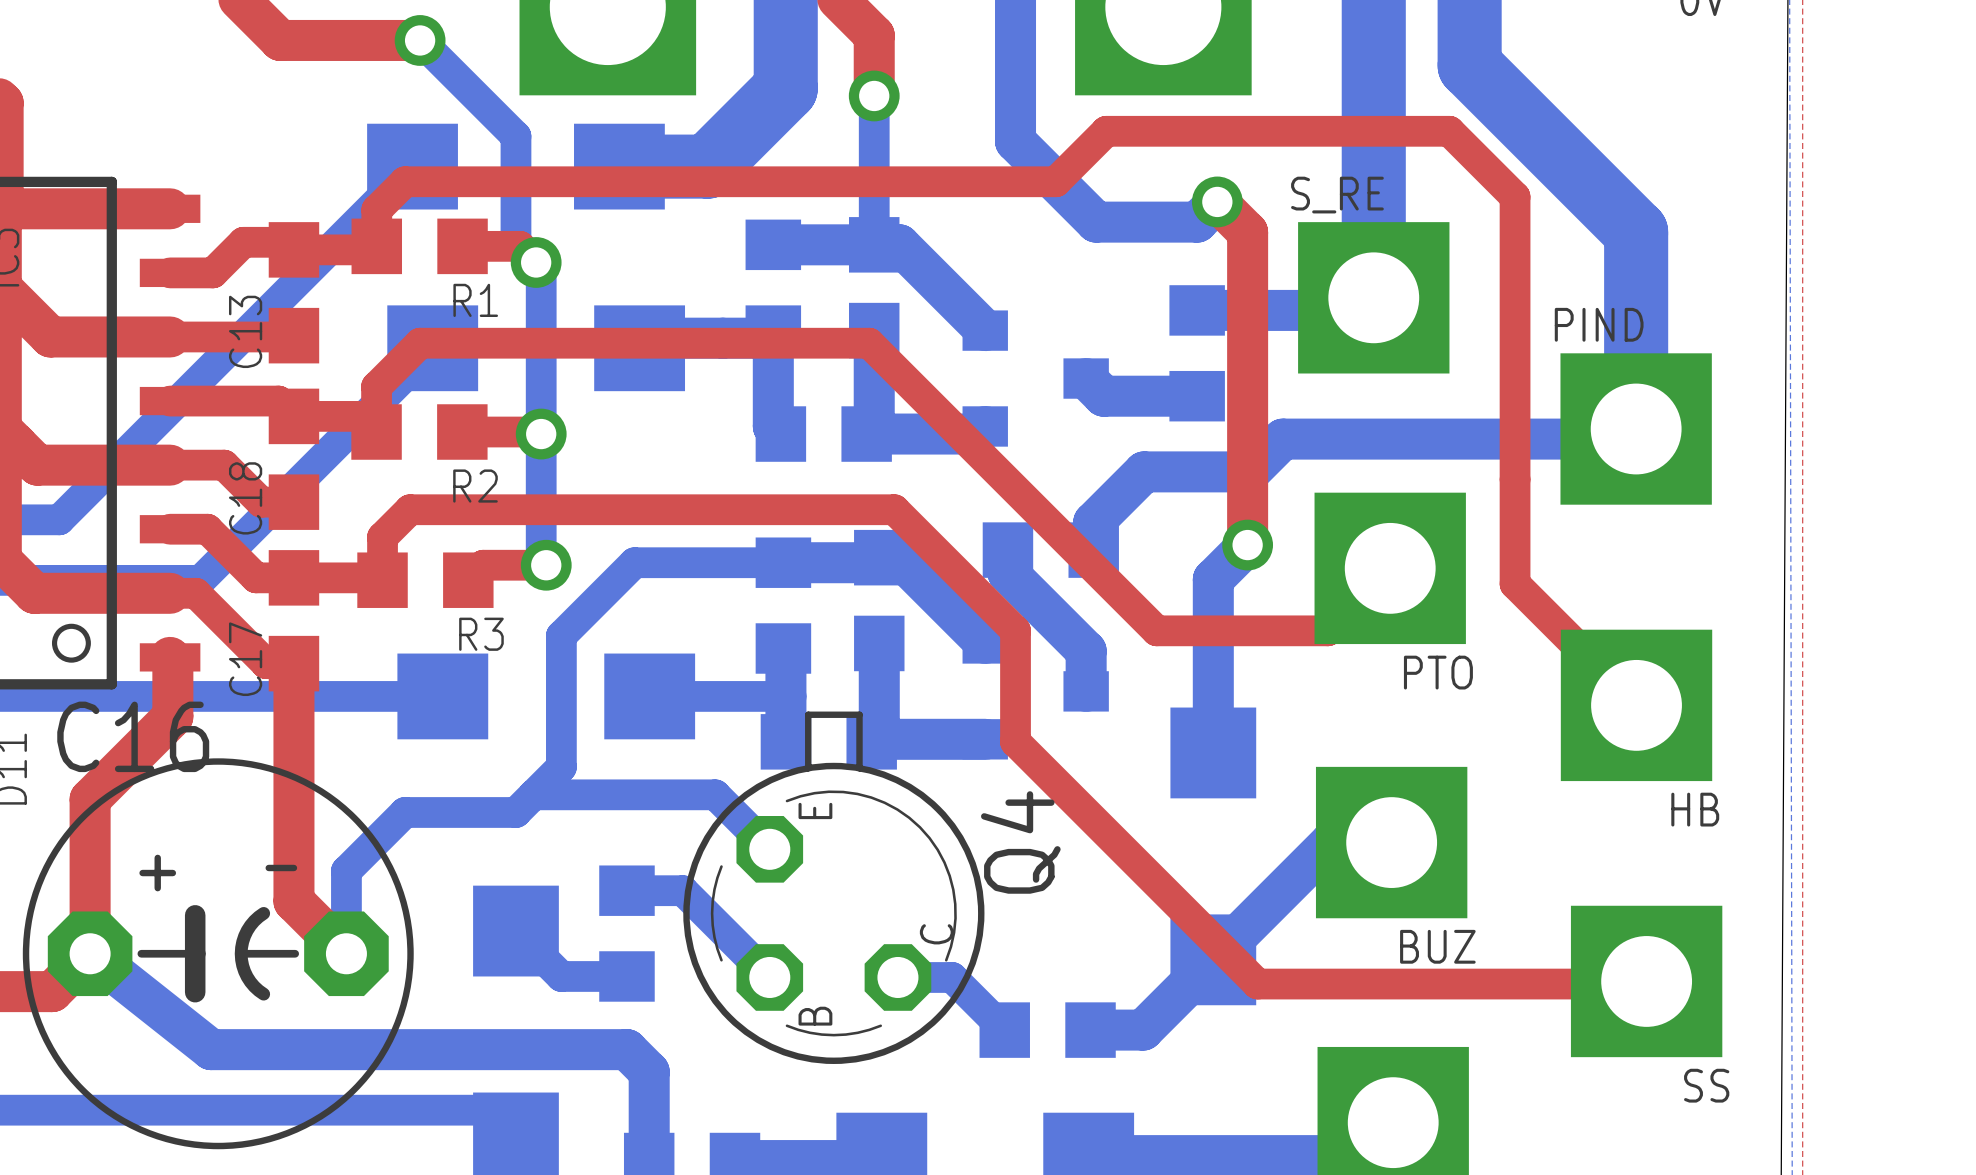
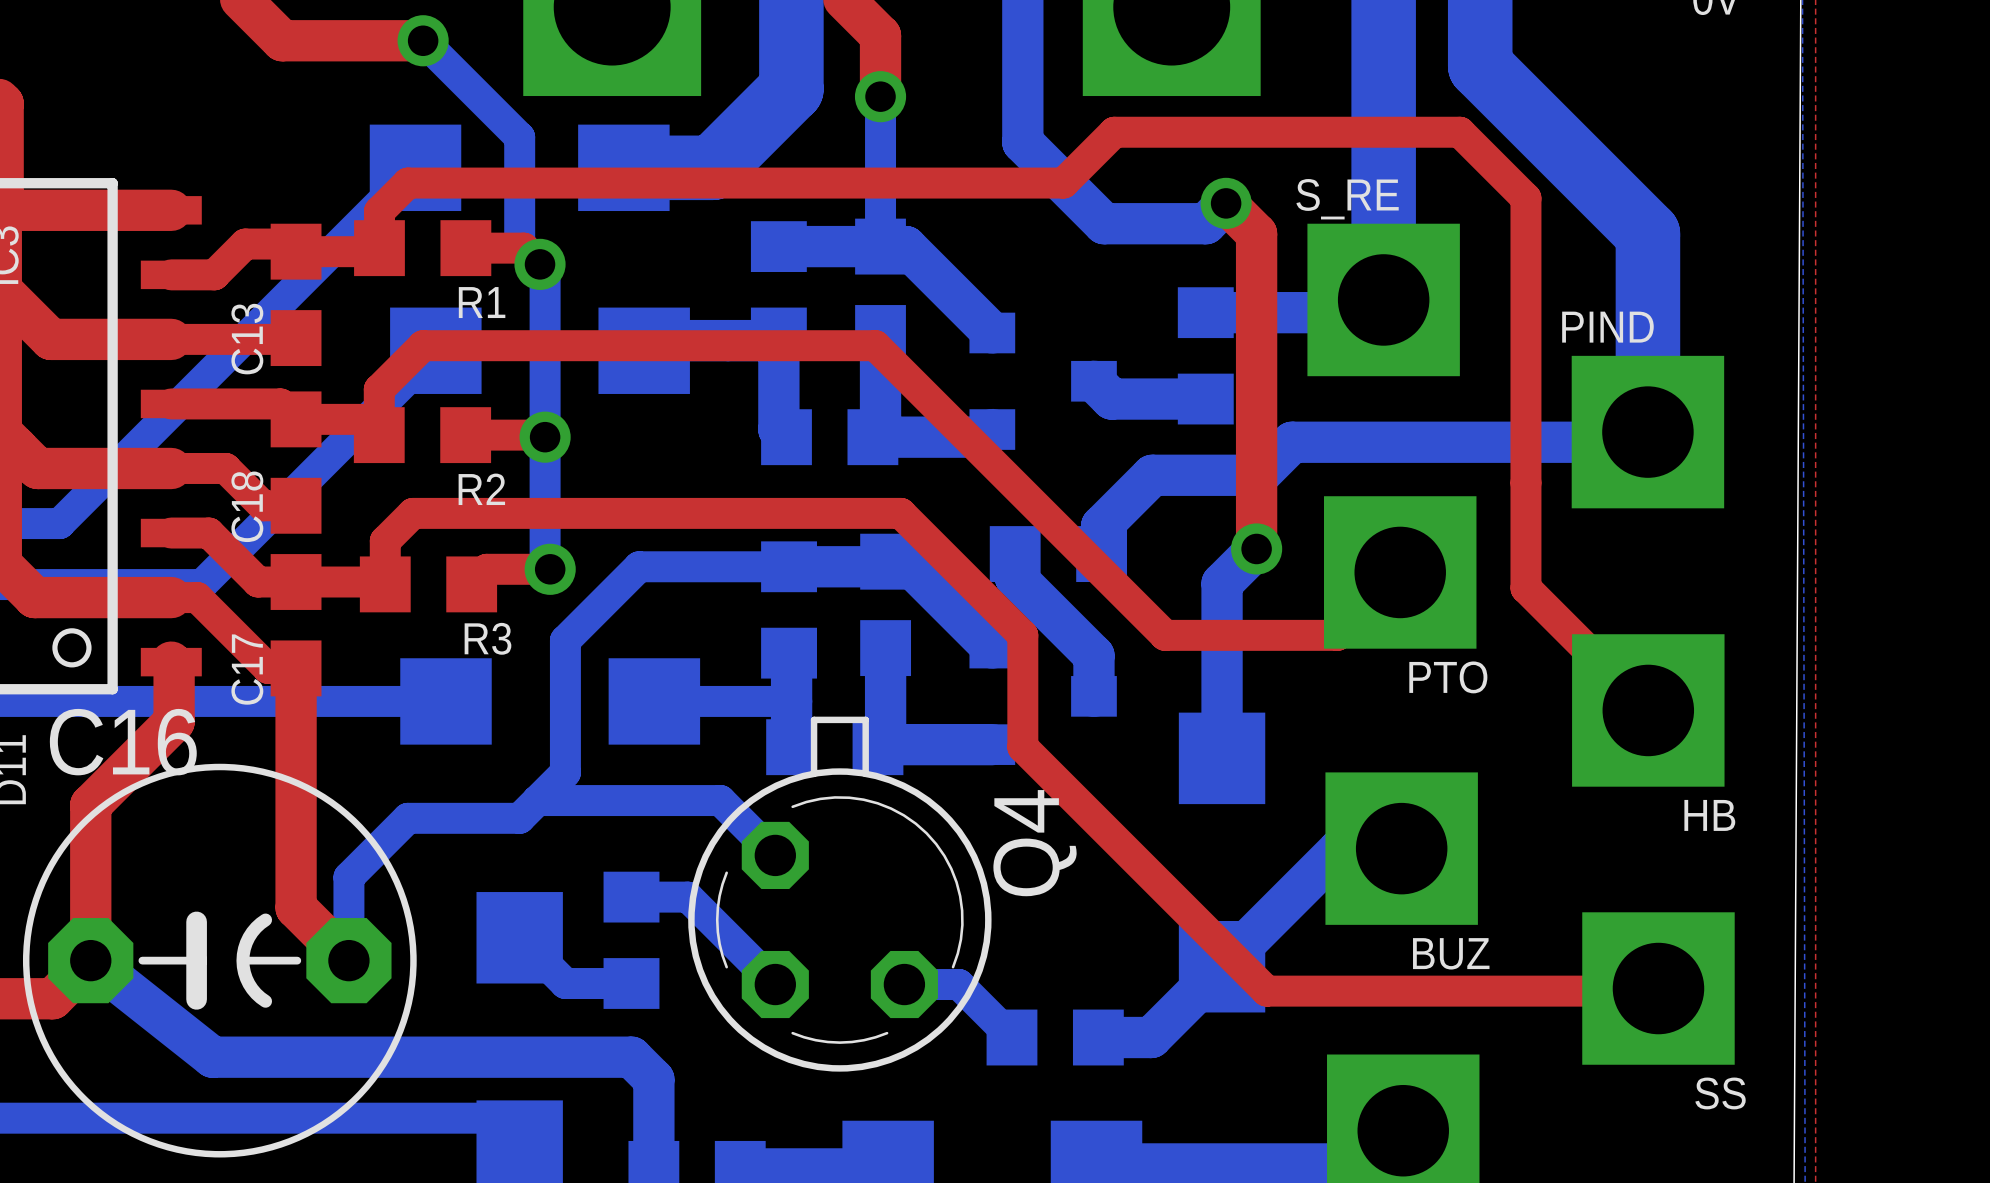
C16 footprint: [22, 758, 414, 1150] -> [22, 763, 417, 1158]
Q4 text: E (815, 810) -> none
Q4 text: C (936, 934) -> none
Q4 text: B (815, 1016) -> none

